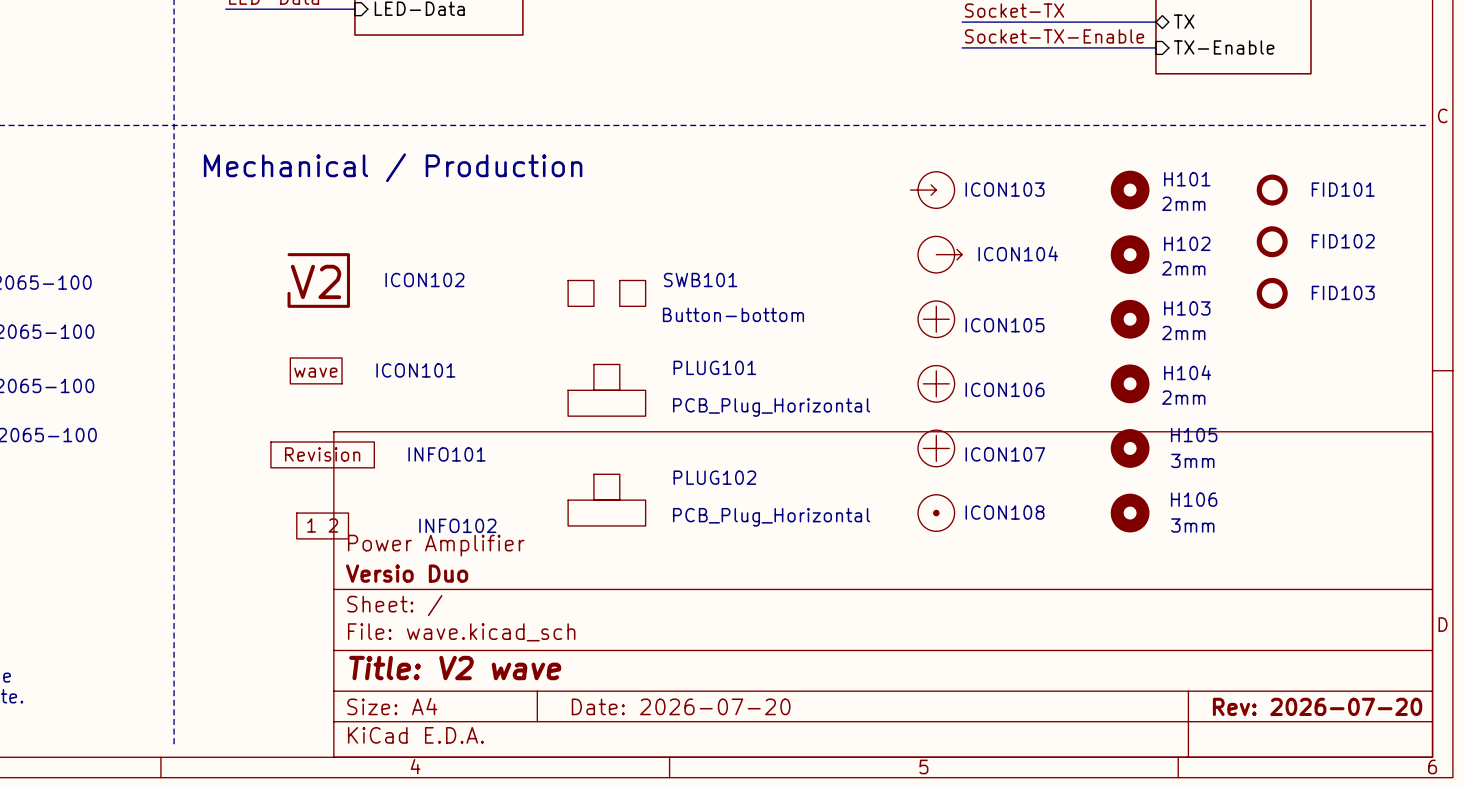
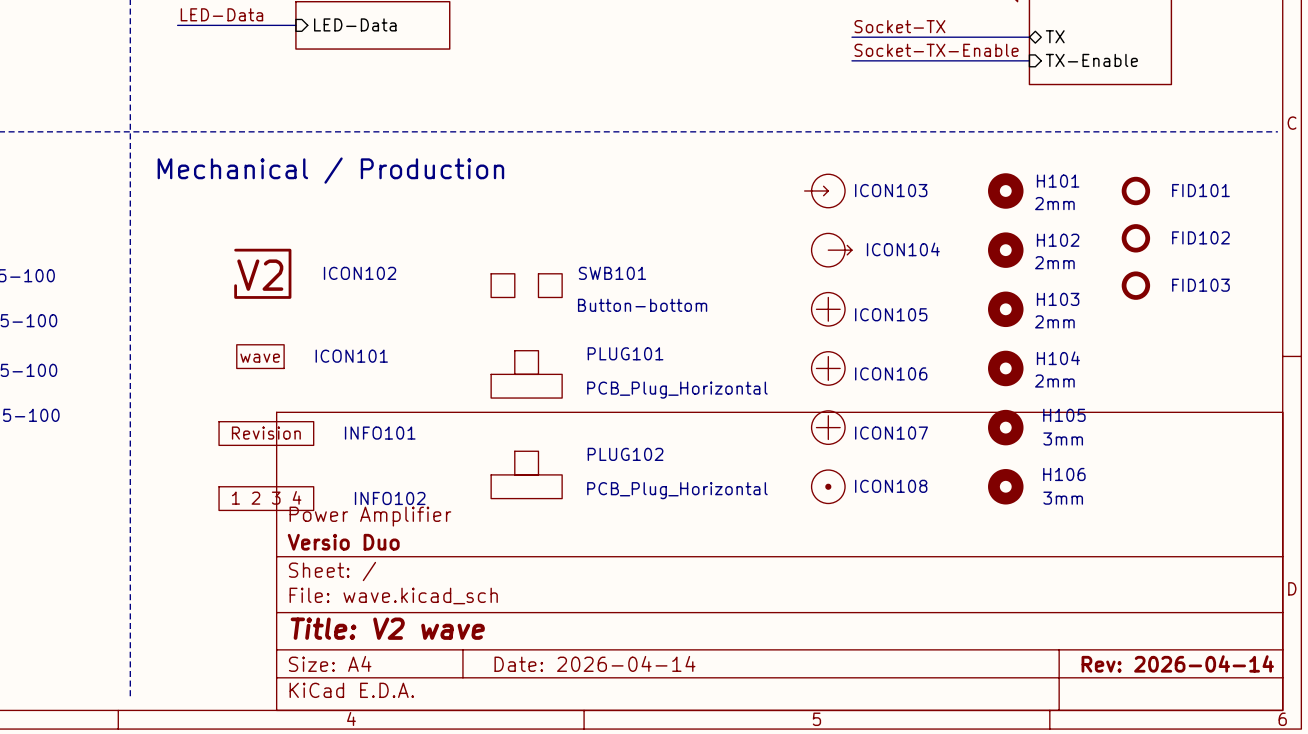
INFO102 symbol: [296, 513, 349, 539] -> [219, 486, 314, 511]
title block: Date: 2026-07-20 (681, 706) -> Date: 2026-04-14 (594, 663)
title block: Rev: 2026-07-20 (1317, 706) -> Rev: 2026-04-14 (1177, 663)

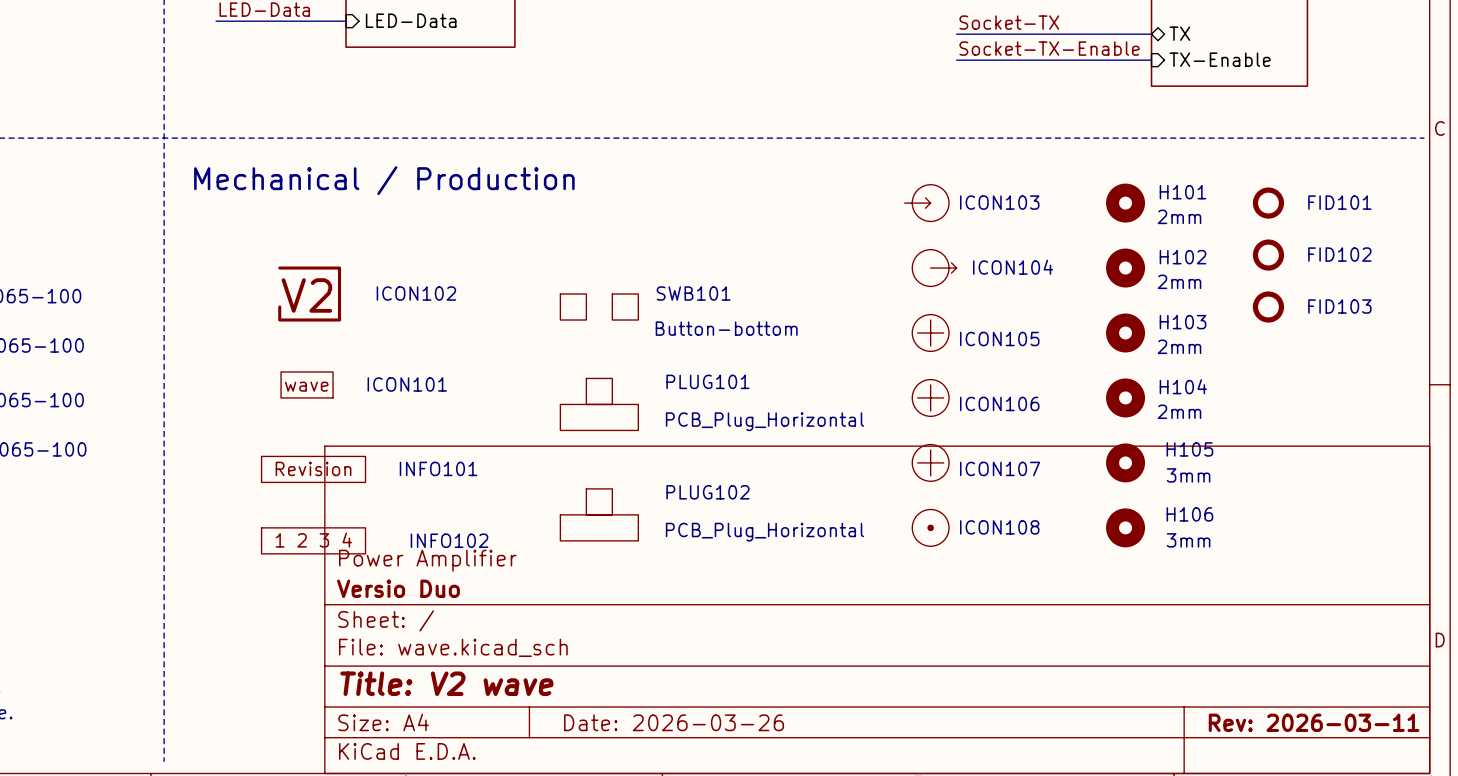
title block: Date: 2026-04-14 (594, 663) -> Date: 2026-03-26 (674, 722)
title block: Rev: 2026-04-14 (1177, 663) -> Rev: 2026-03-11 (1314, 722)

